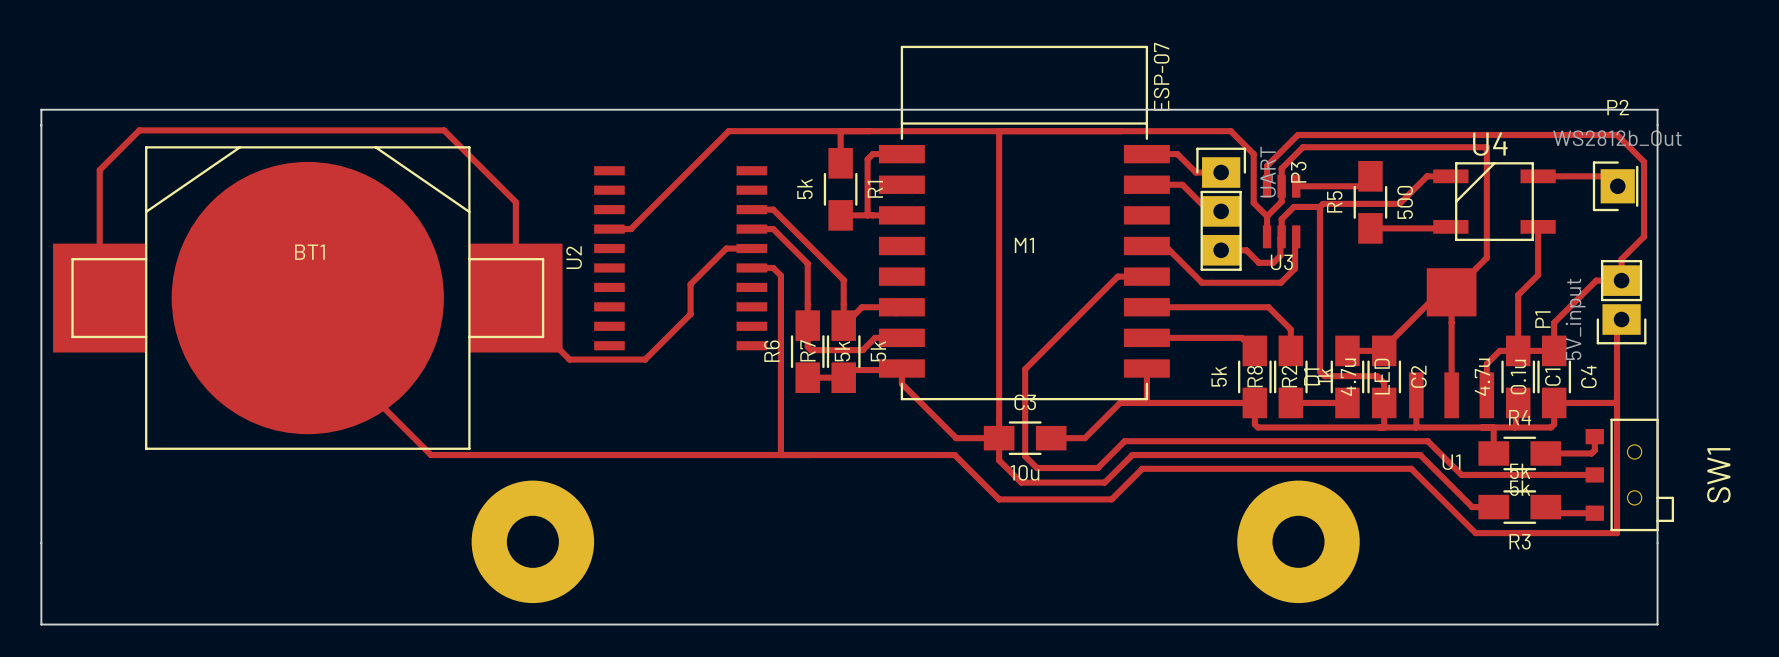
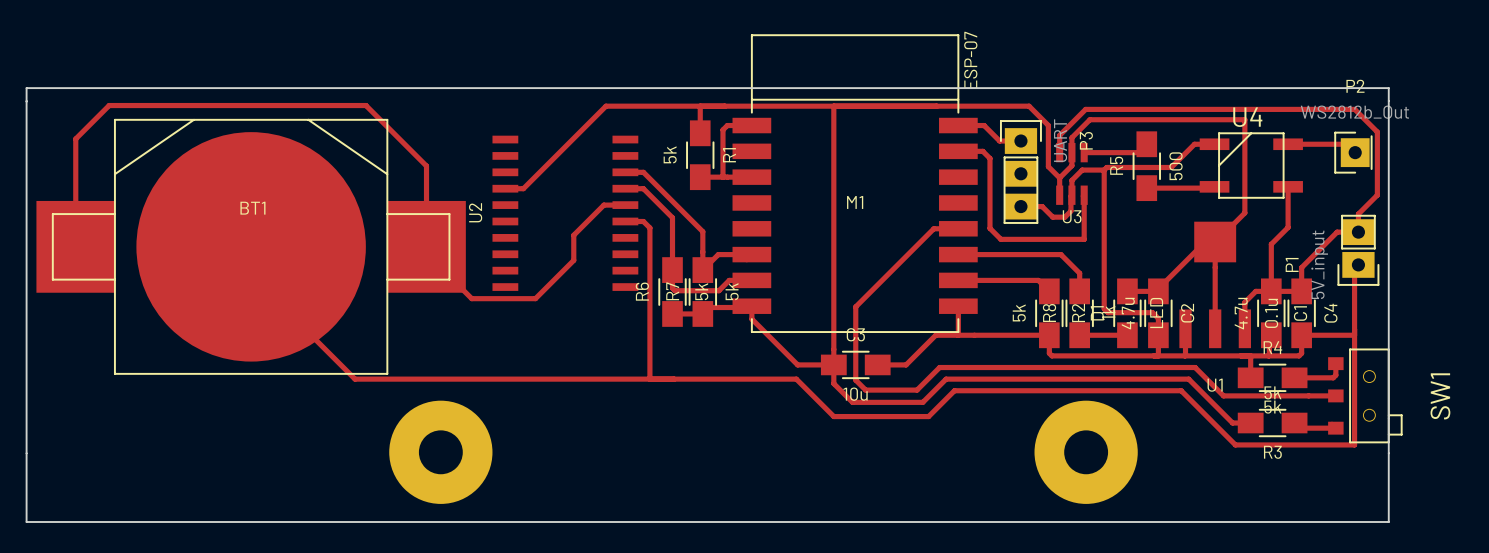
track: (1175, 184) (1182, 184) (1209, 211) -> (982, 151) (989, 158) (989, 228) (1000, 239) (1084, 239) (1084, 195)
track: (1295, 237) (1295, 268) (1280, 282) (1202, 282) (1165, 246) -> none

